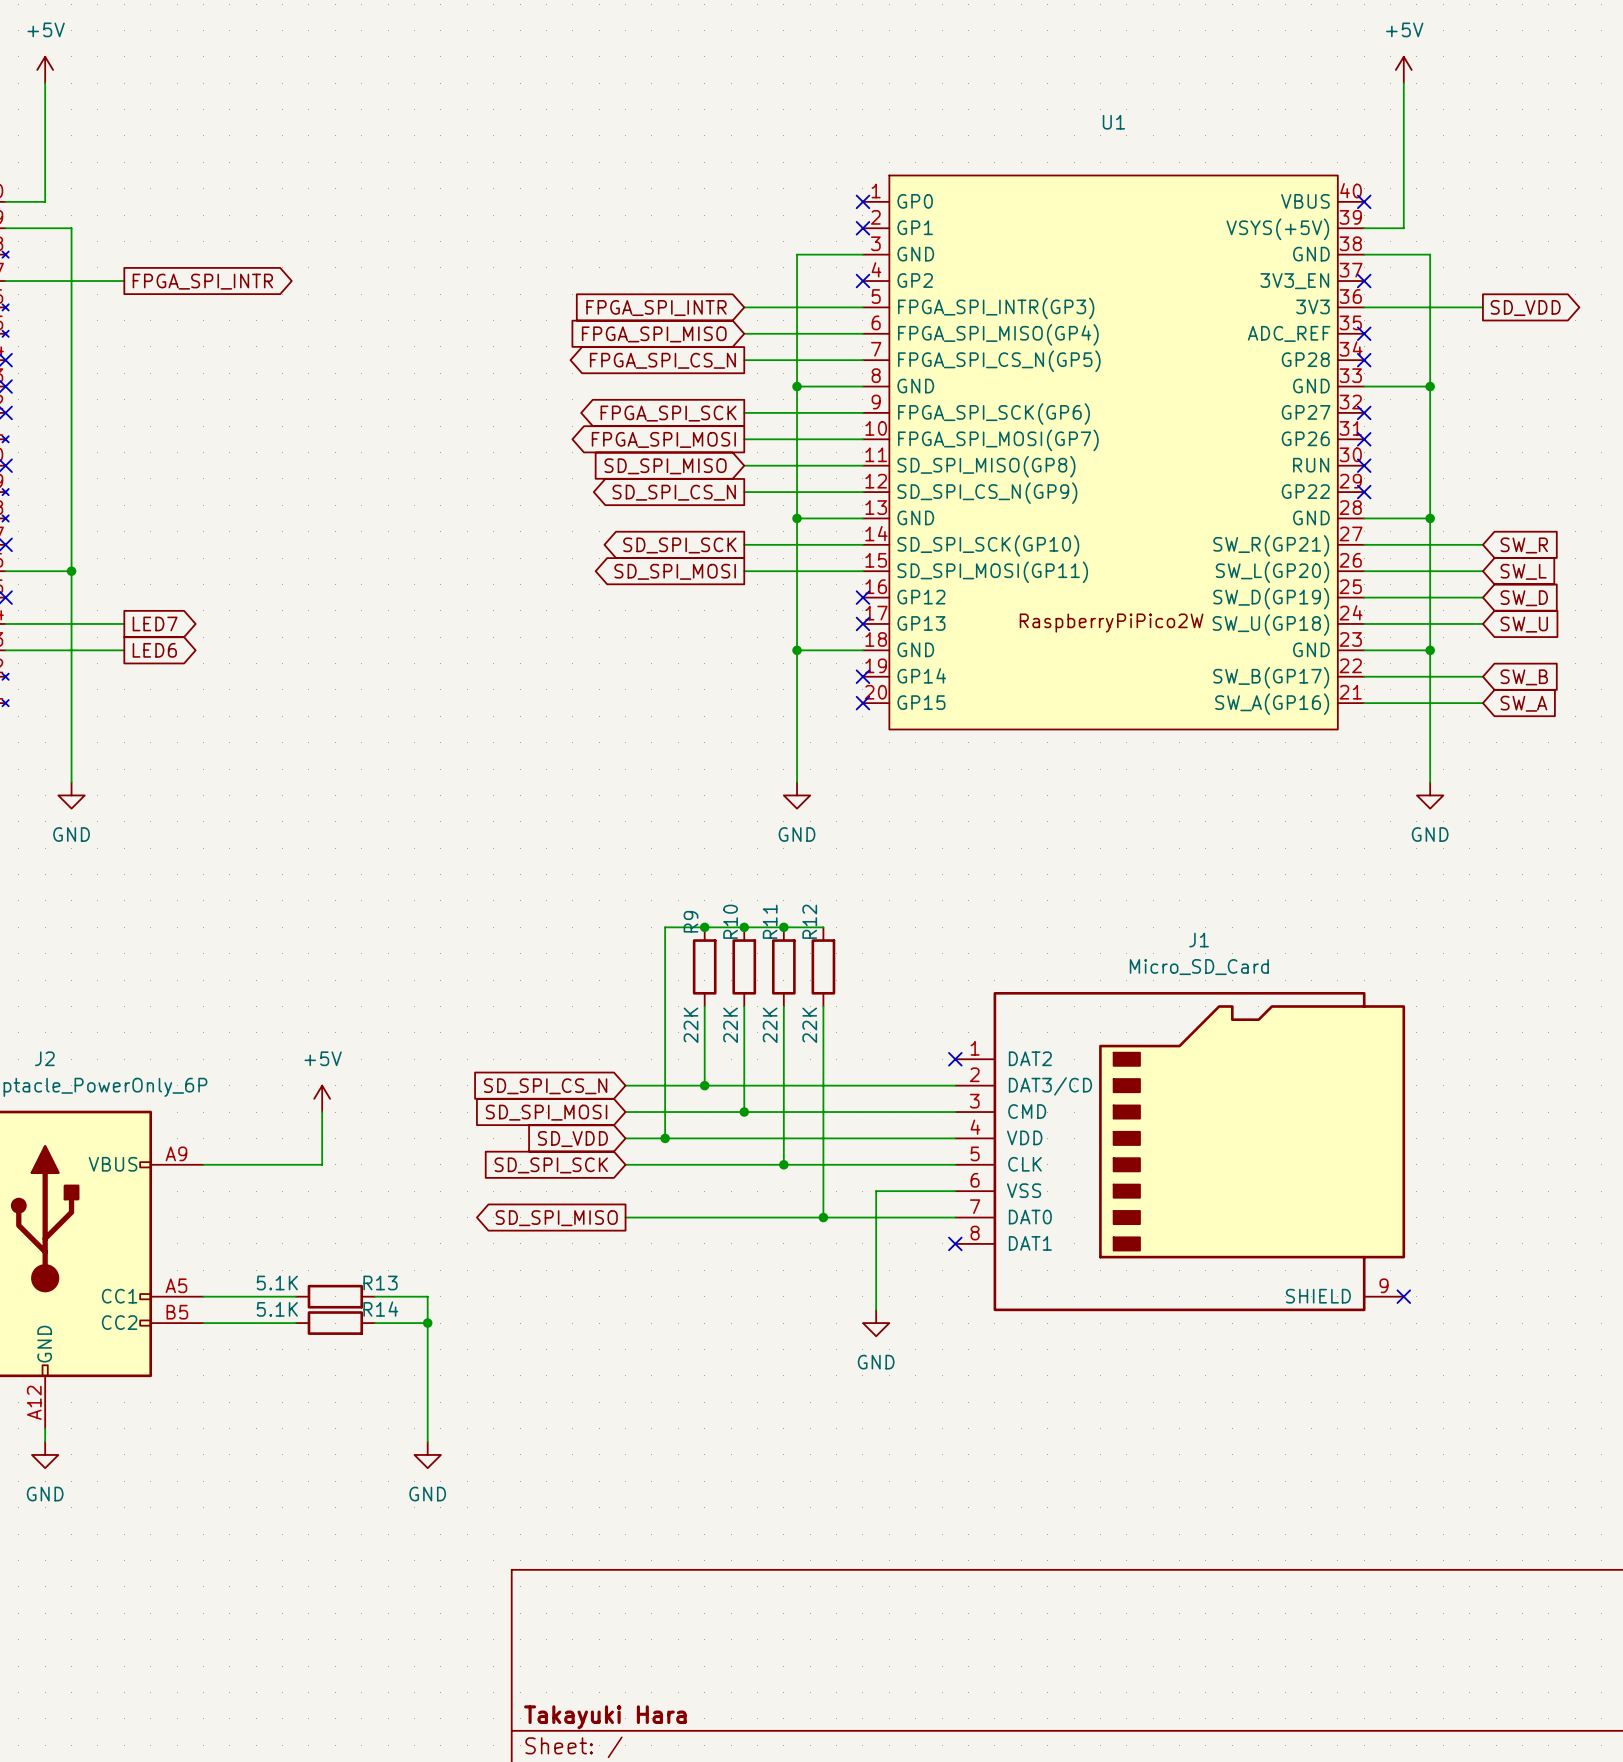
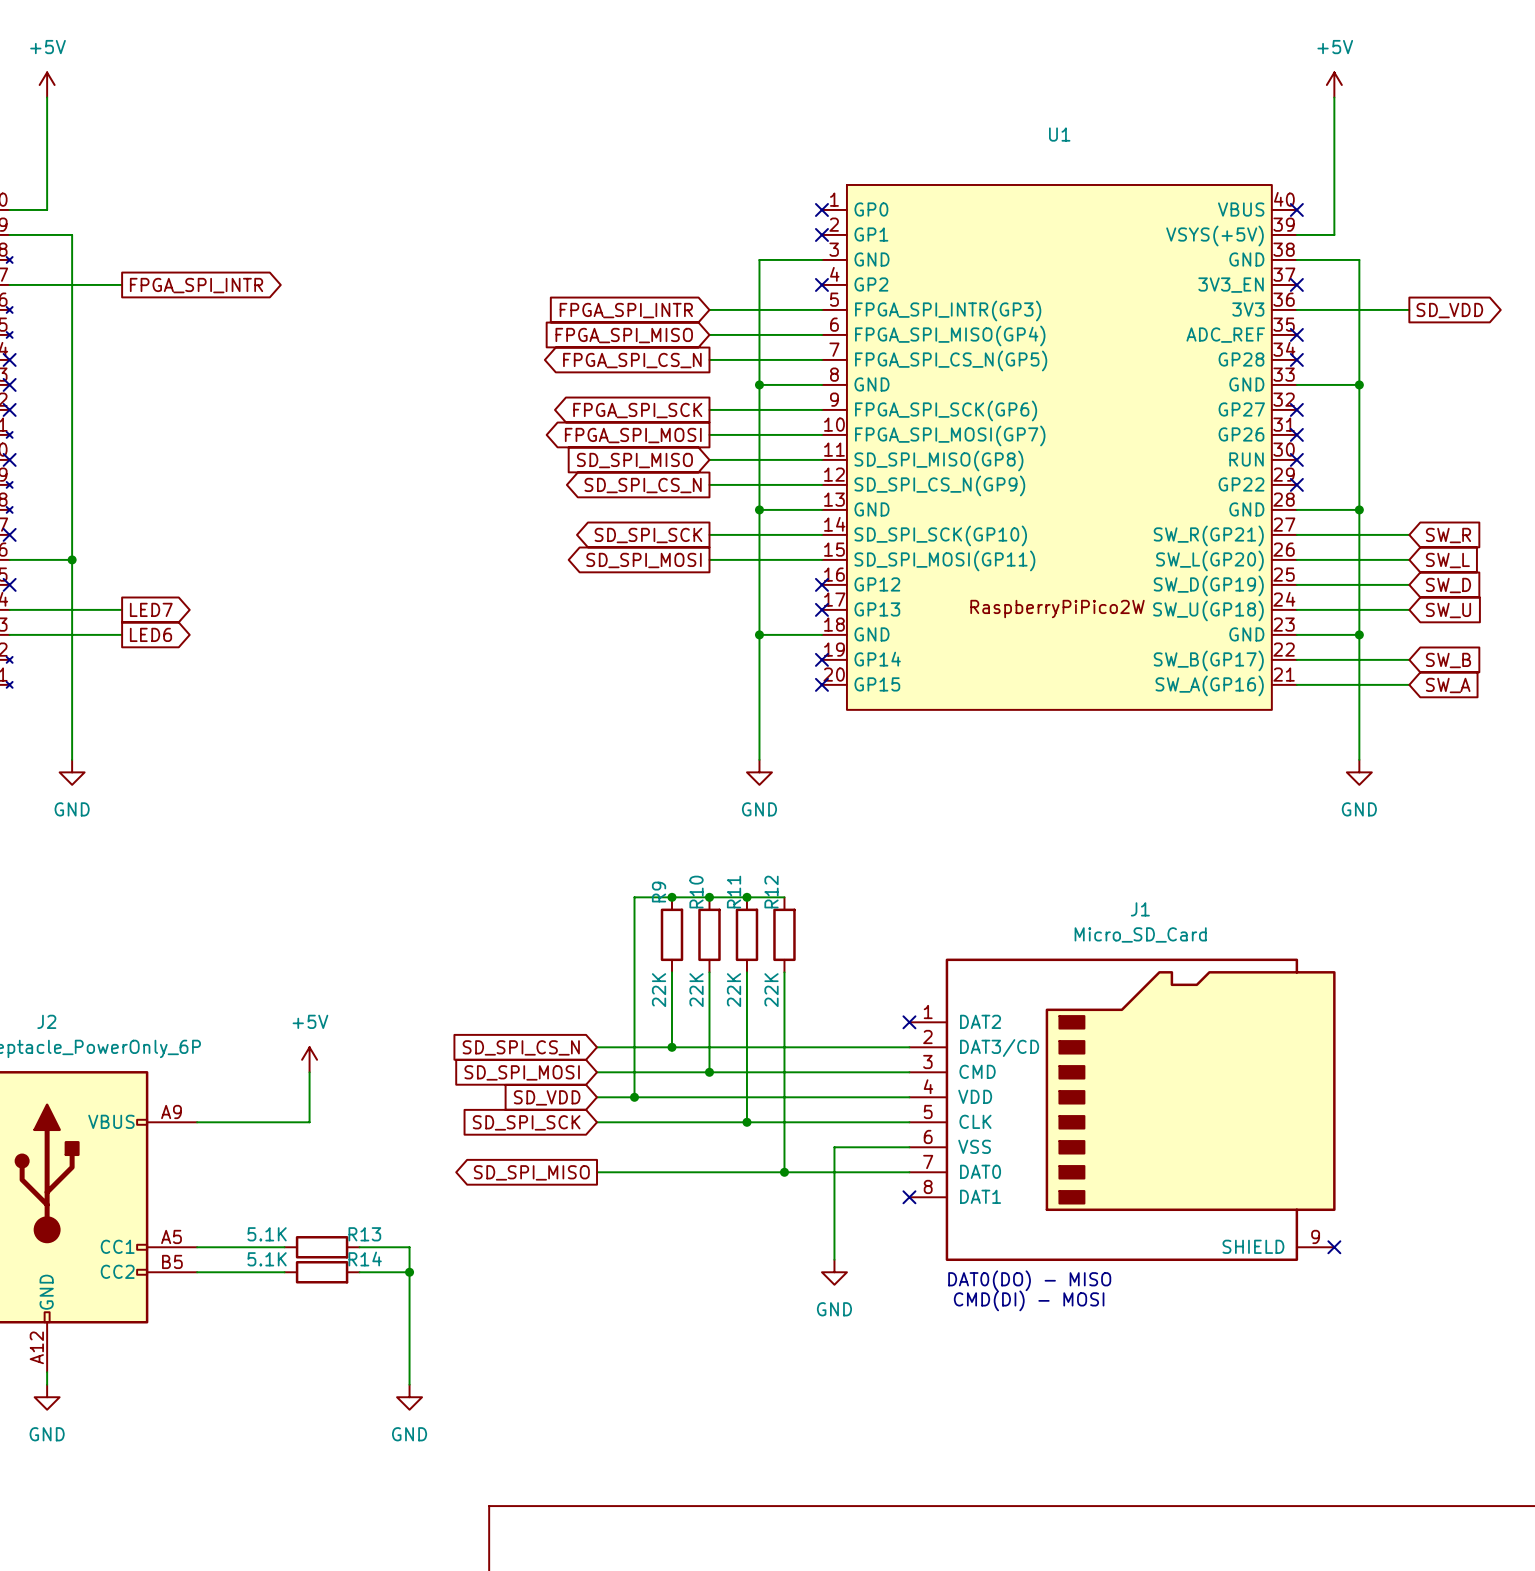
text: none -> DAT0(DO) - MISO (1029, 1280)
text: none -> CMD(DI) - MOSI (1029, 1300)

